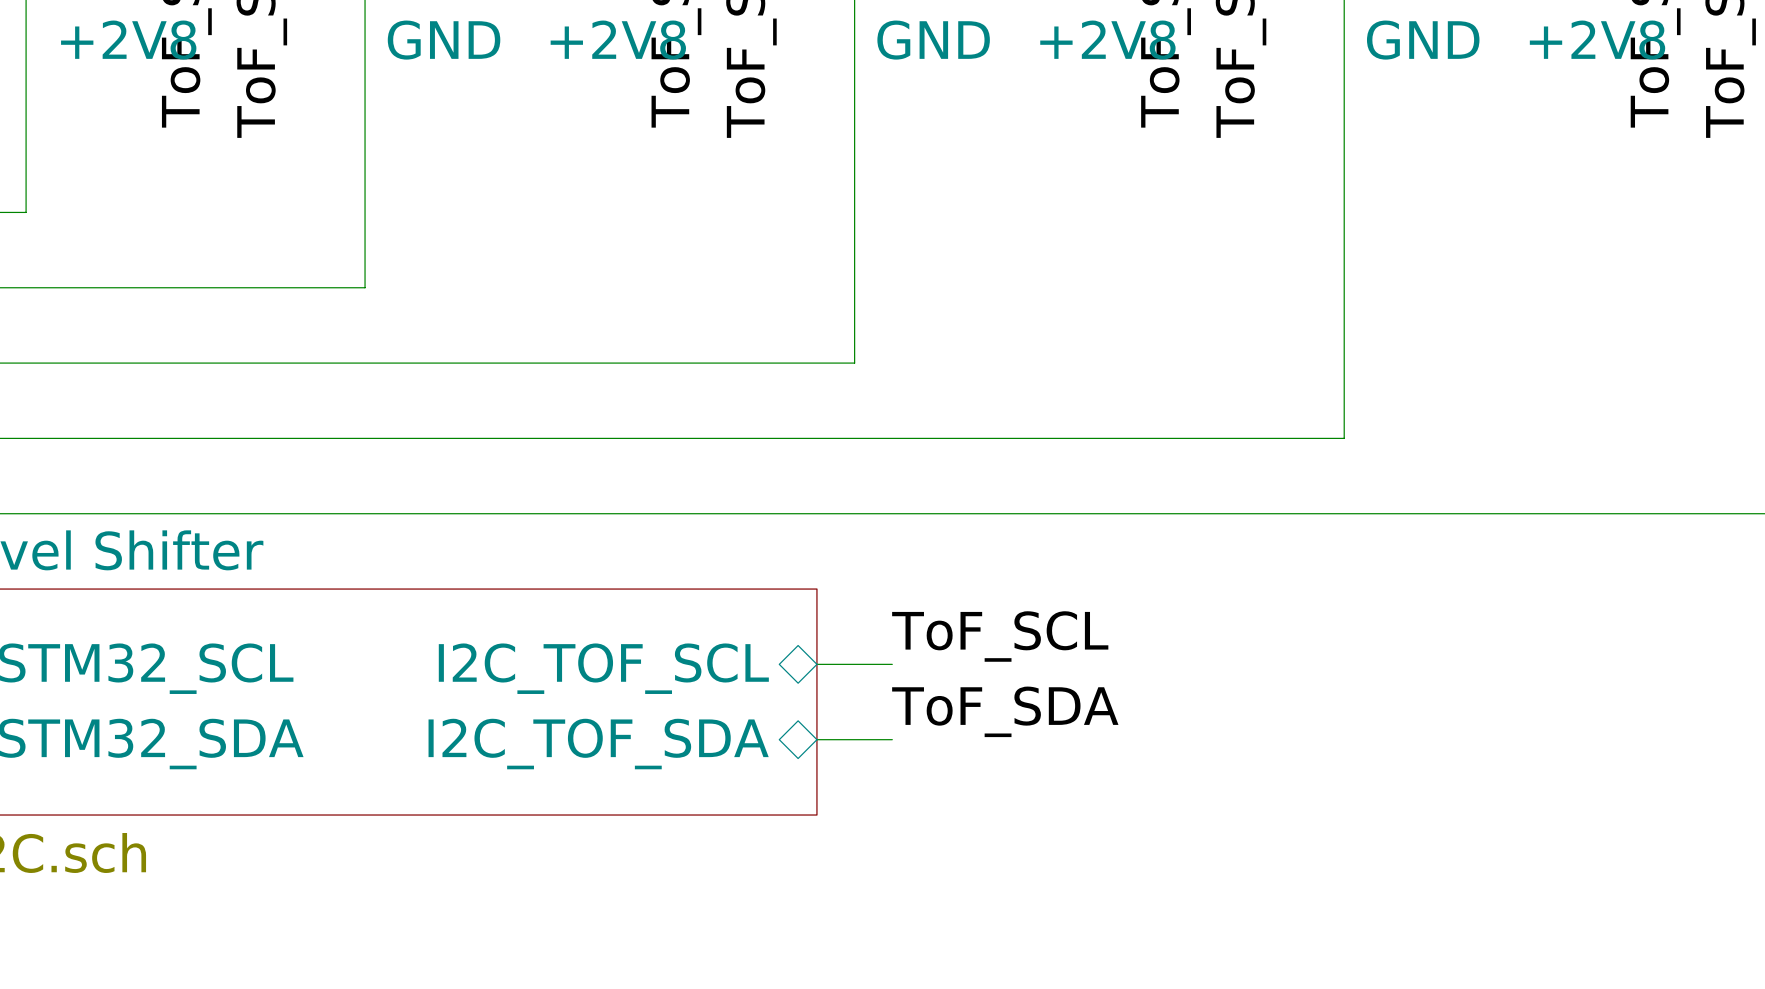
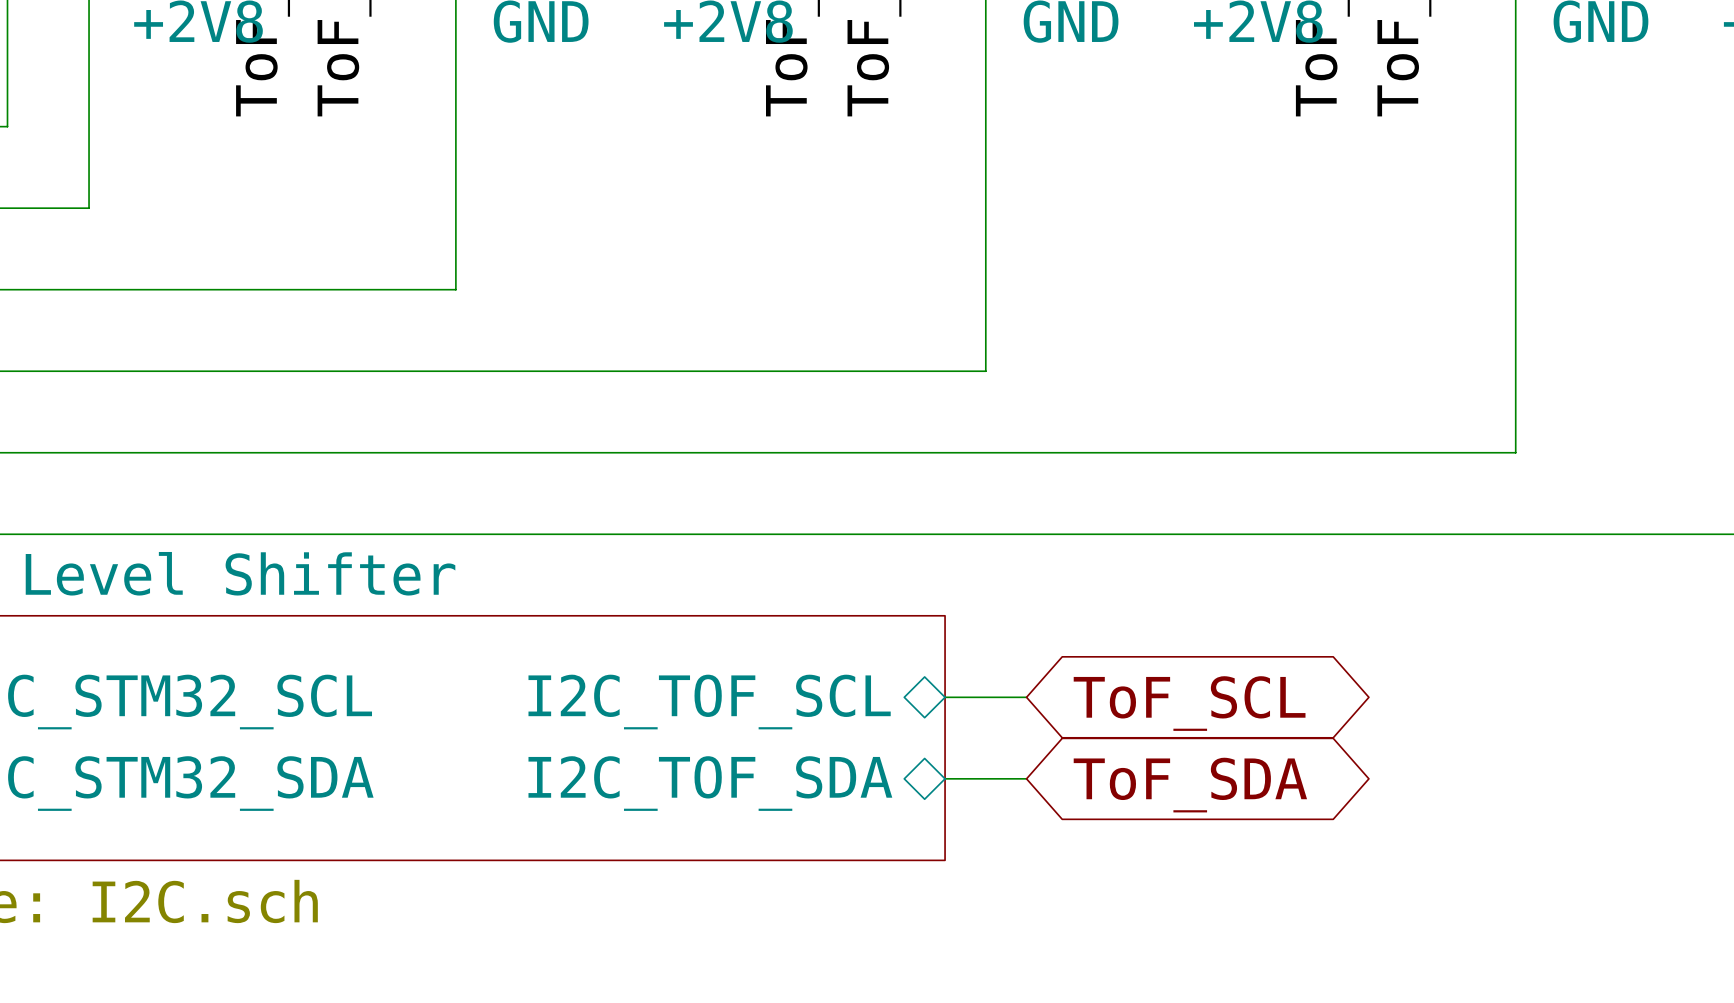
label: ToF_SCL (1000, 636) -> none
global label: none -> ToF_SCL (1189, 703)
label: ToF_SDA (1005, 711) -> none
global label: none -> ToF_SDA (1190, 785)

